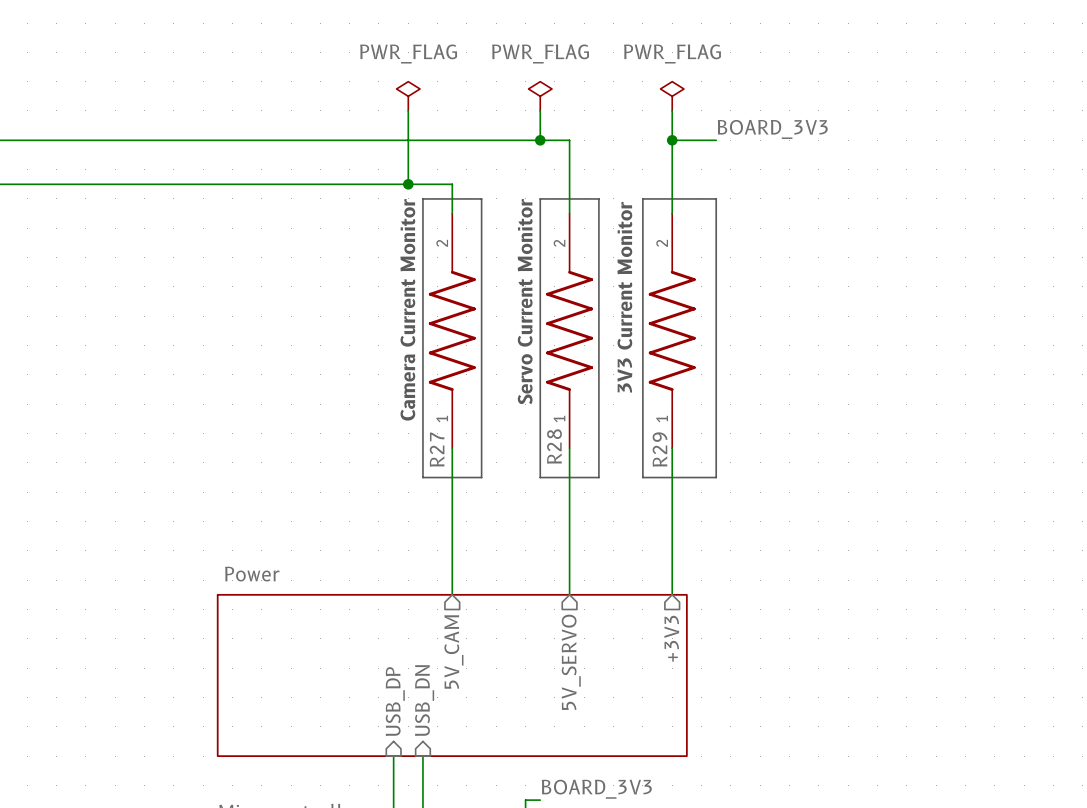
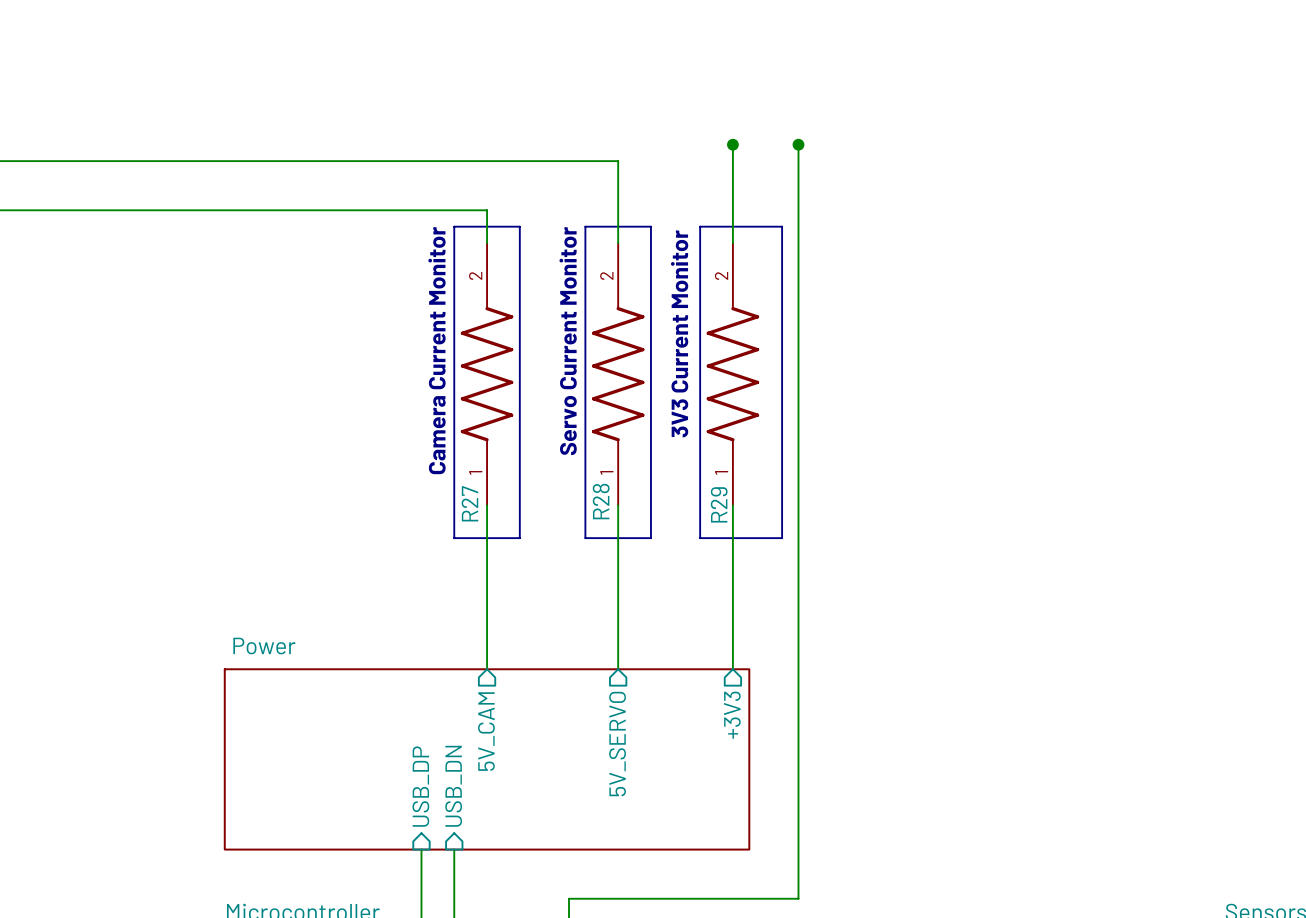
power symbol: PWR_FLAG (408, 96) -> none
power symbol: PWR_FLAG (540, 96) -> none
power symbol: PWR_FLAG (672, 96) -> none
wire: (408, 110) (408, 184) -> none
wire: (540, 110) (540, 140) -> none
wire: (672, 110) (672, 125) -> none
wire: none -> (798, 144) (798, 898) (585, 898)
junction: none -> (798, 144)
label: BOARD_3V3 (772, 129) -> none
junction: (540, 140) -> none
wire: (672, 140) (716, 140) -> none
junction position: (672, 140) -> (732, 144)
junction: (408, 184) -> none
label: BOARD_3V3 (596, 789) -> none

